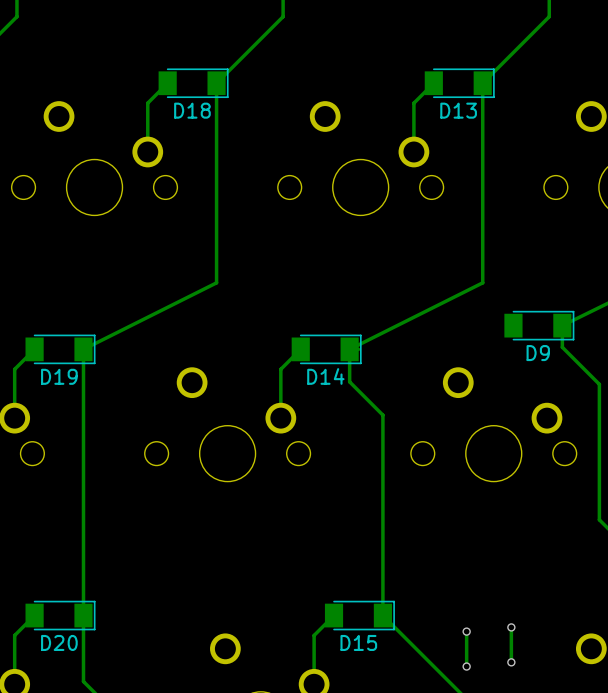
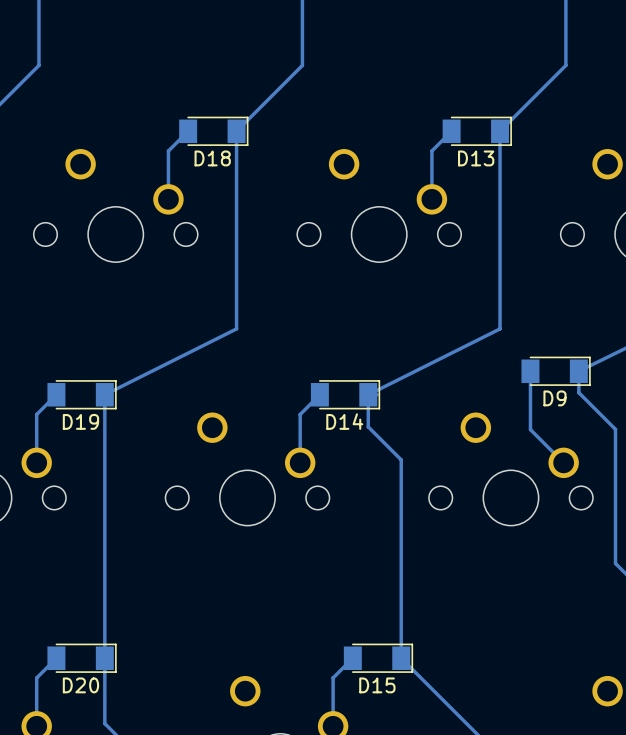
track: none -> (530, 371) (530, 429) (563, 462)
track: (511, 627) (511, 662) -> none
via: (511, 627) -> none
track: (466, 631) (466, 666) -> none
via: (466, 631) -> none
via: (511, 662) -> none
via: (466, 666) -> none

